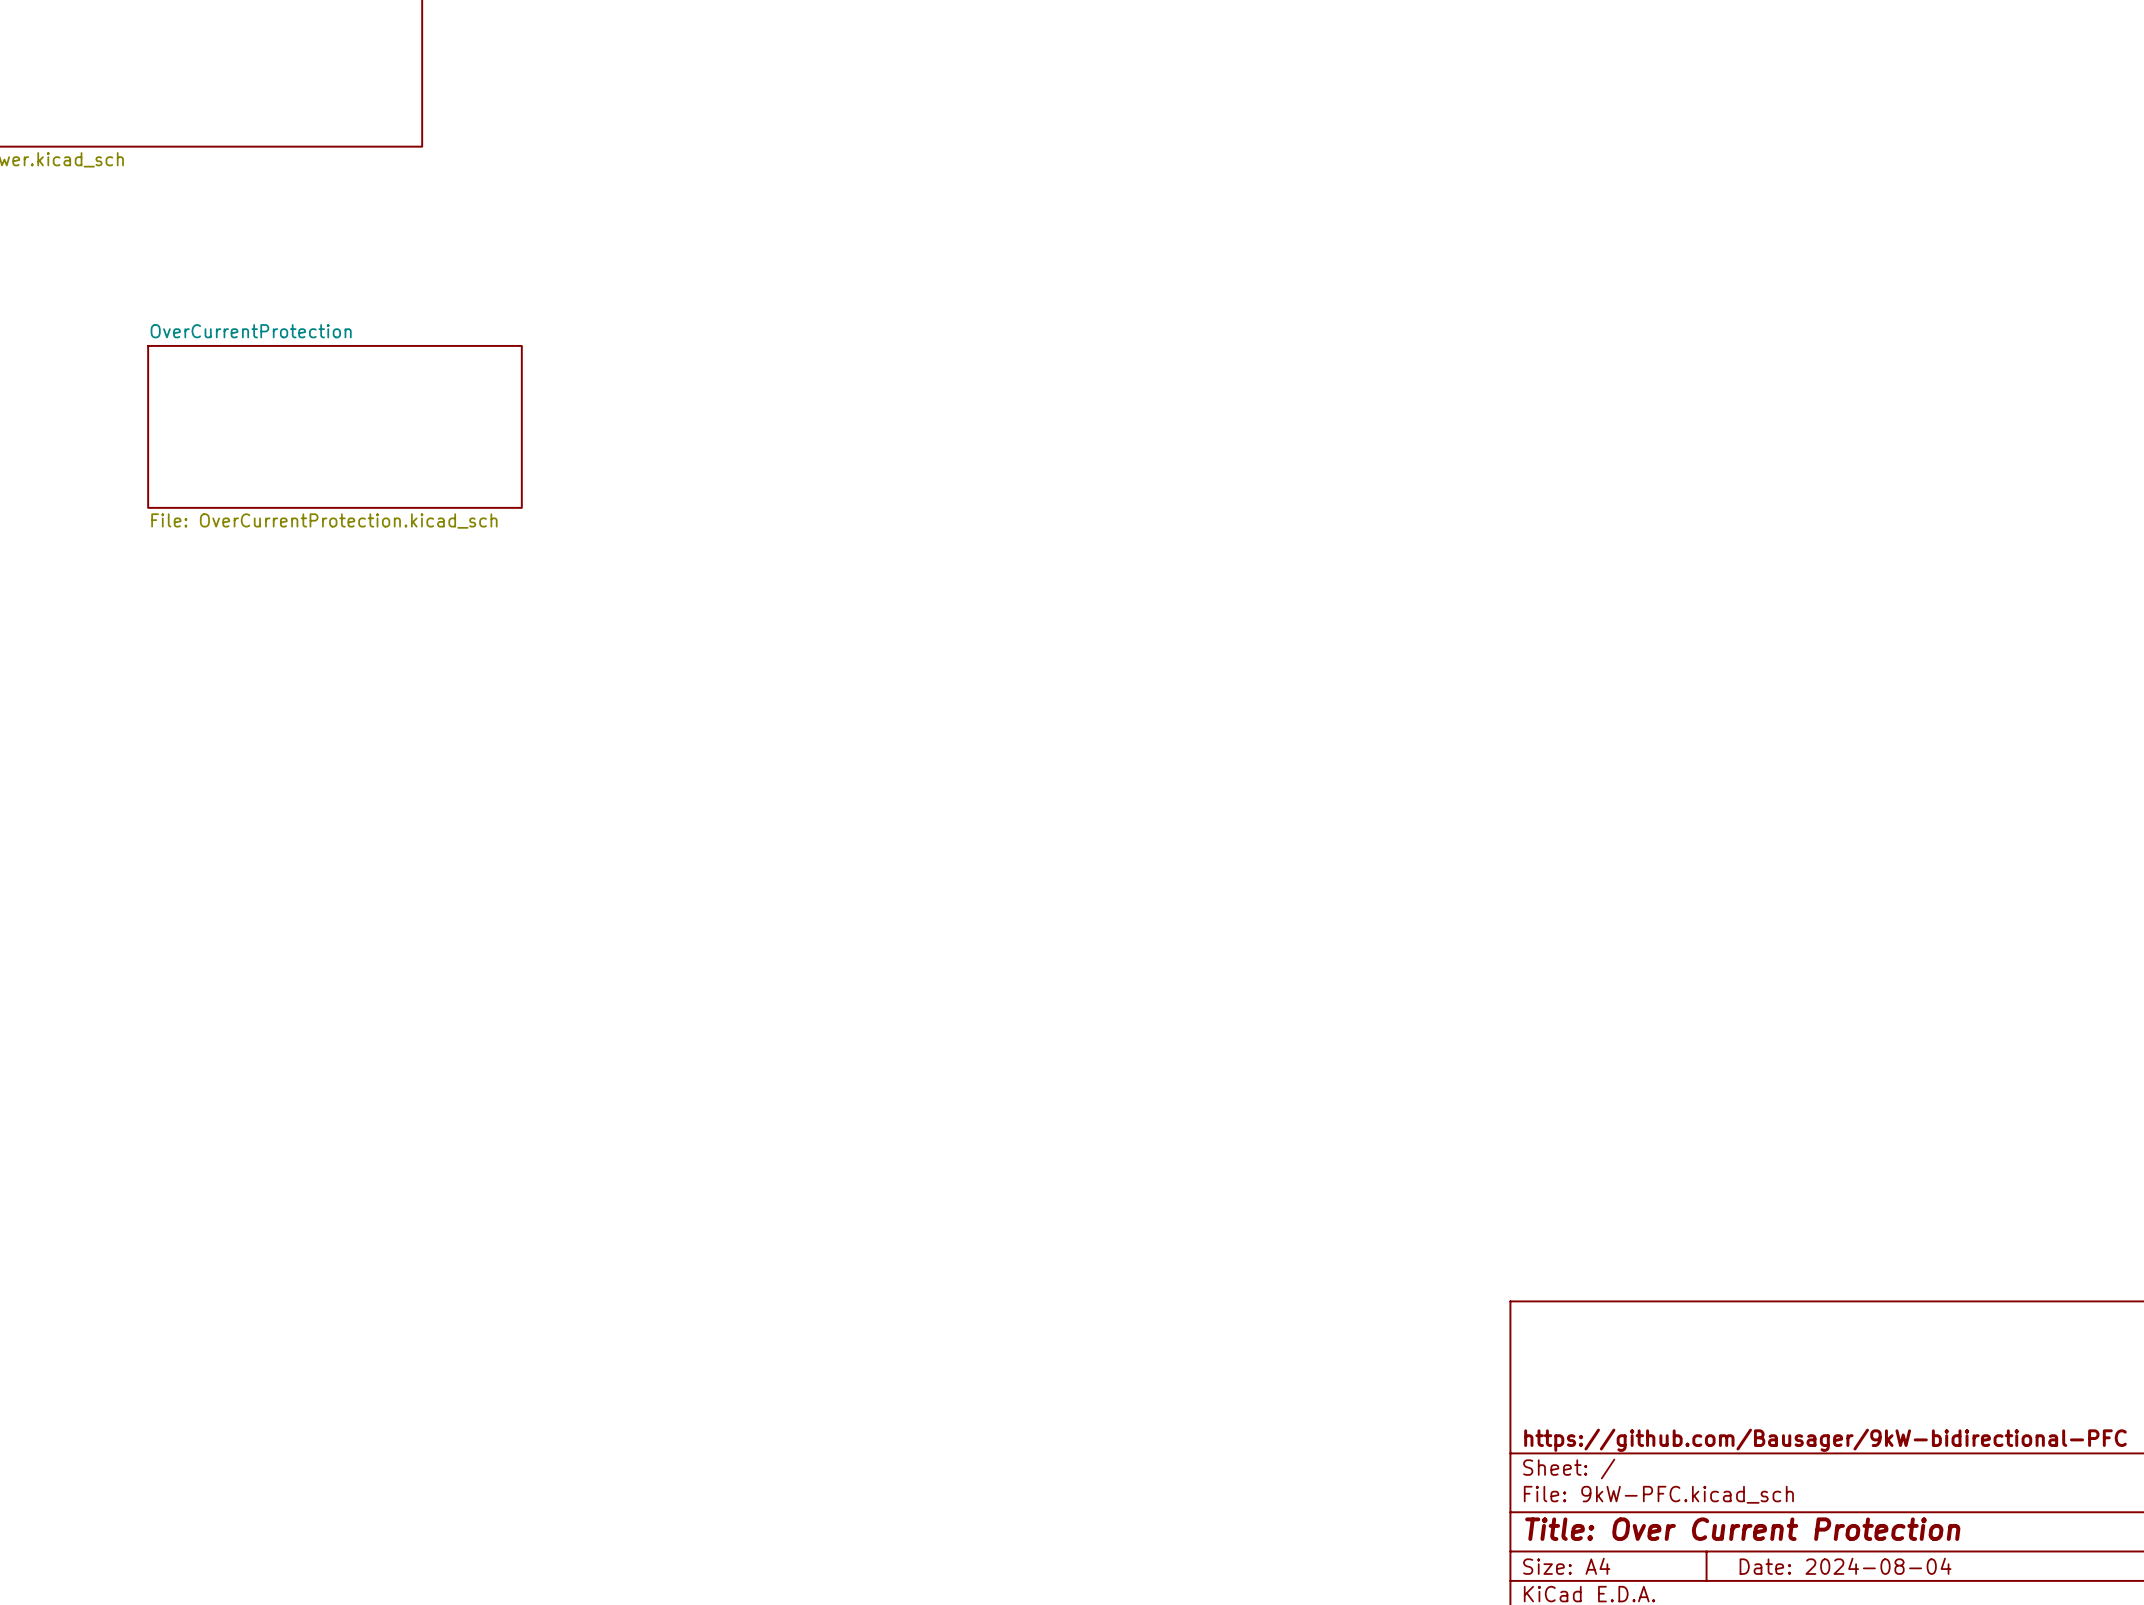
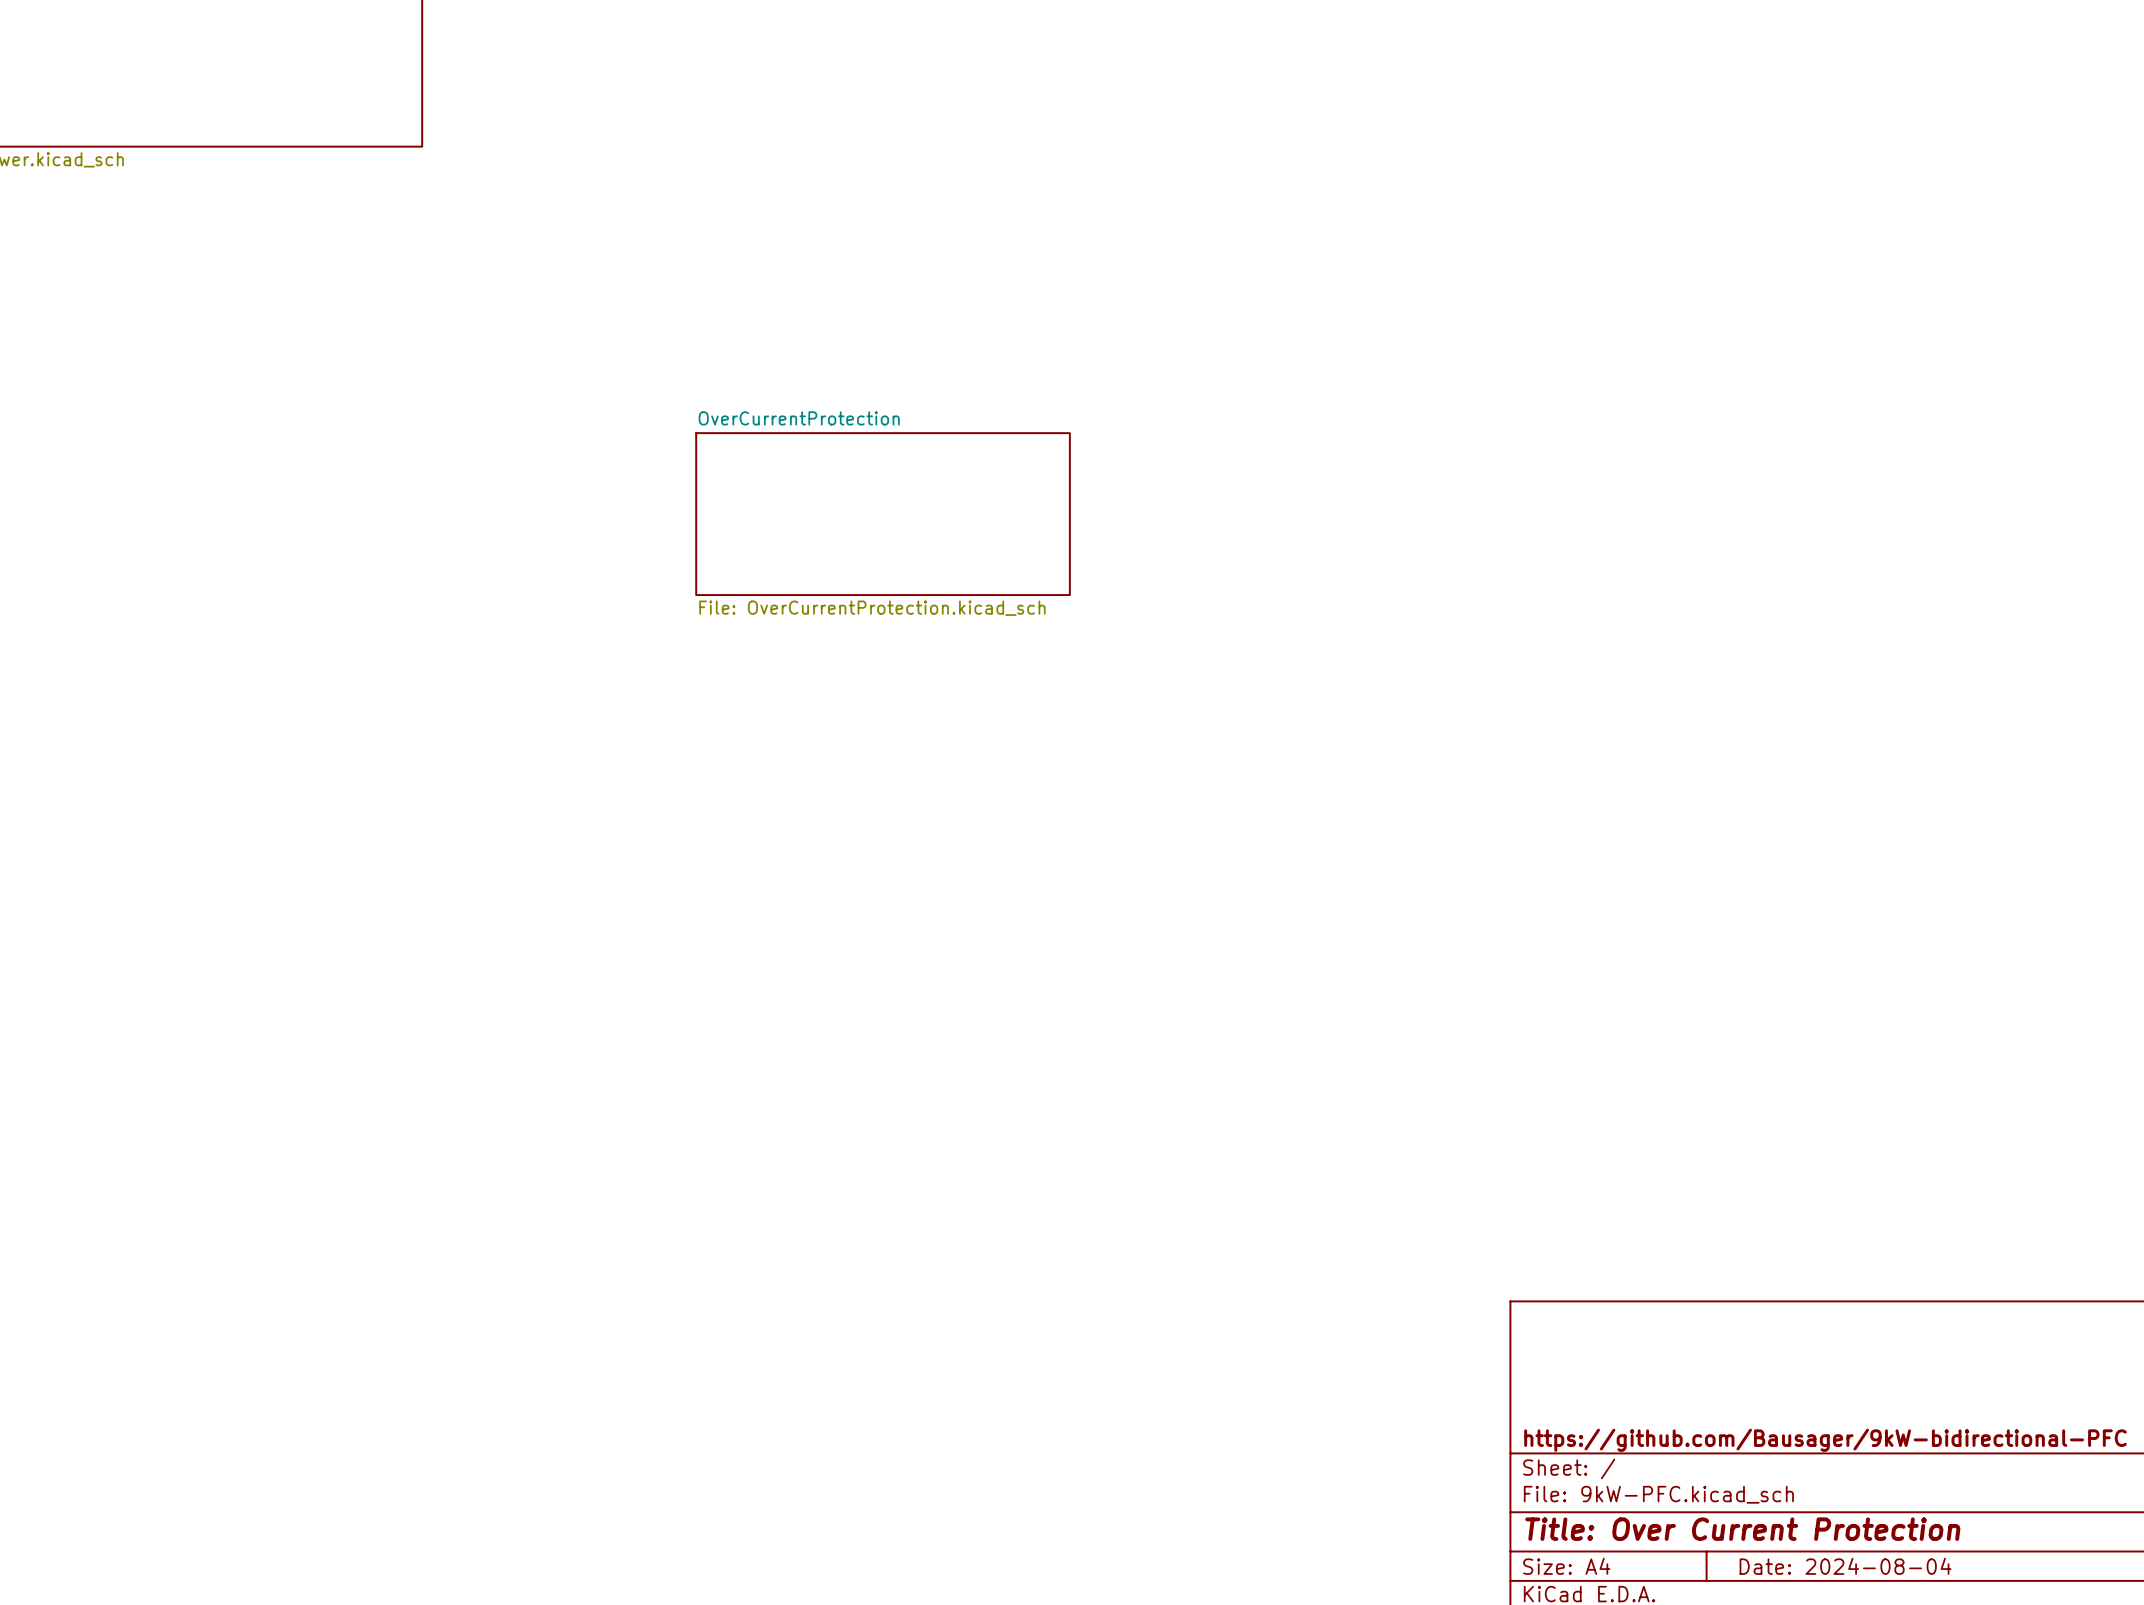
sheet OverCurrentProtection: File: OverCurrentProtection.kicad_sch (334, 426) -> none
sheet OverCurrentProtection: none -> File: OverCurrentProtection.kicad_sch (883, 514)

